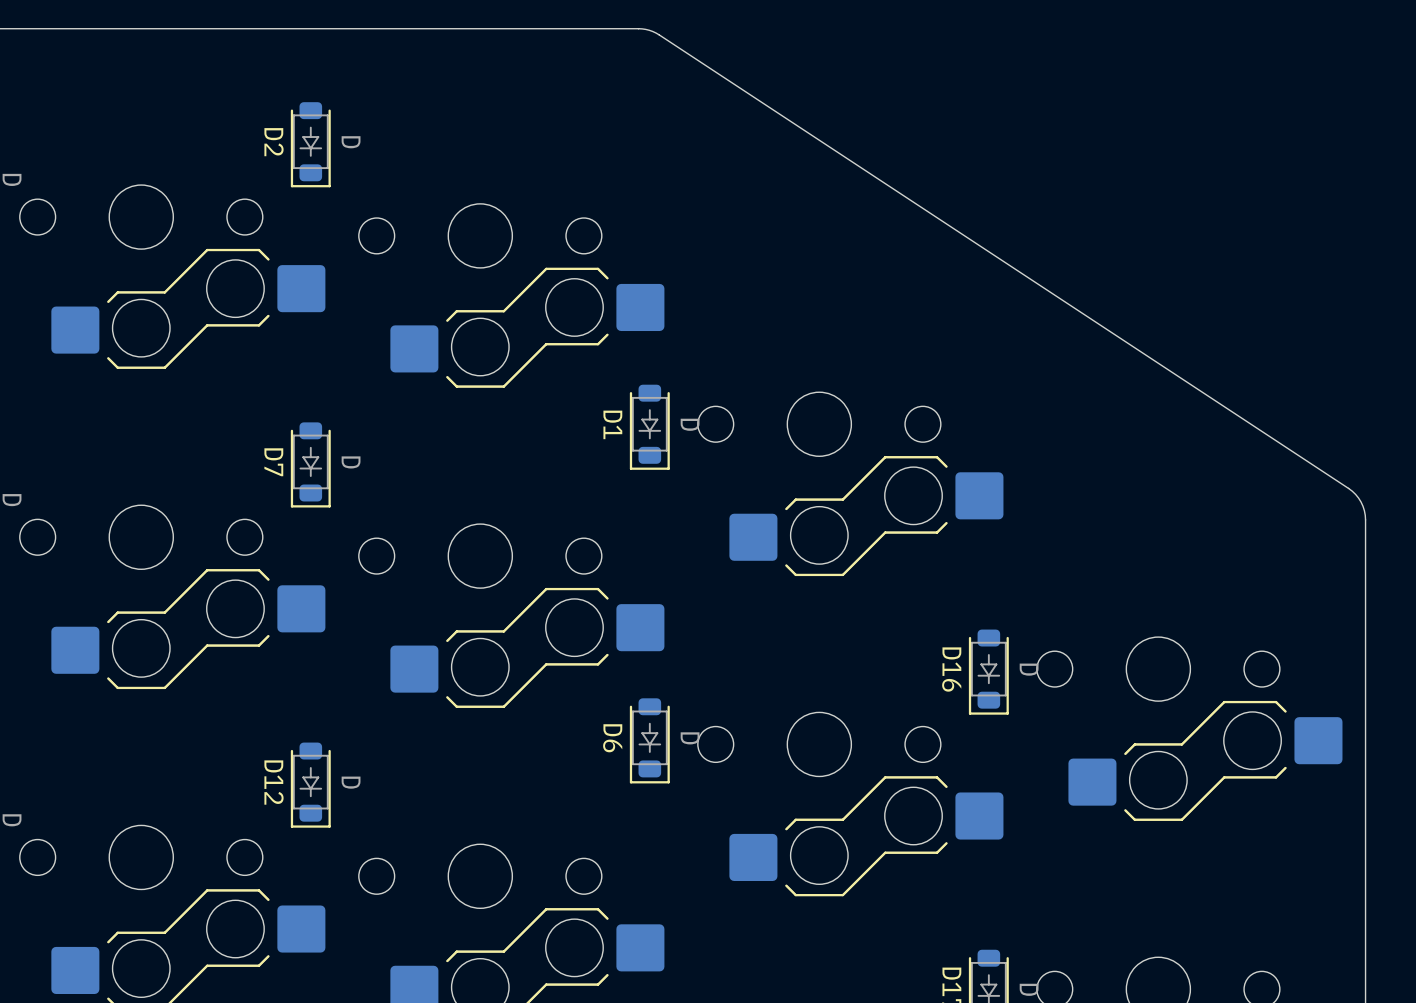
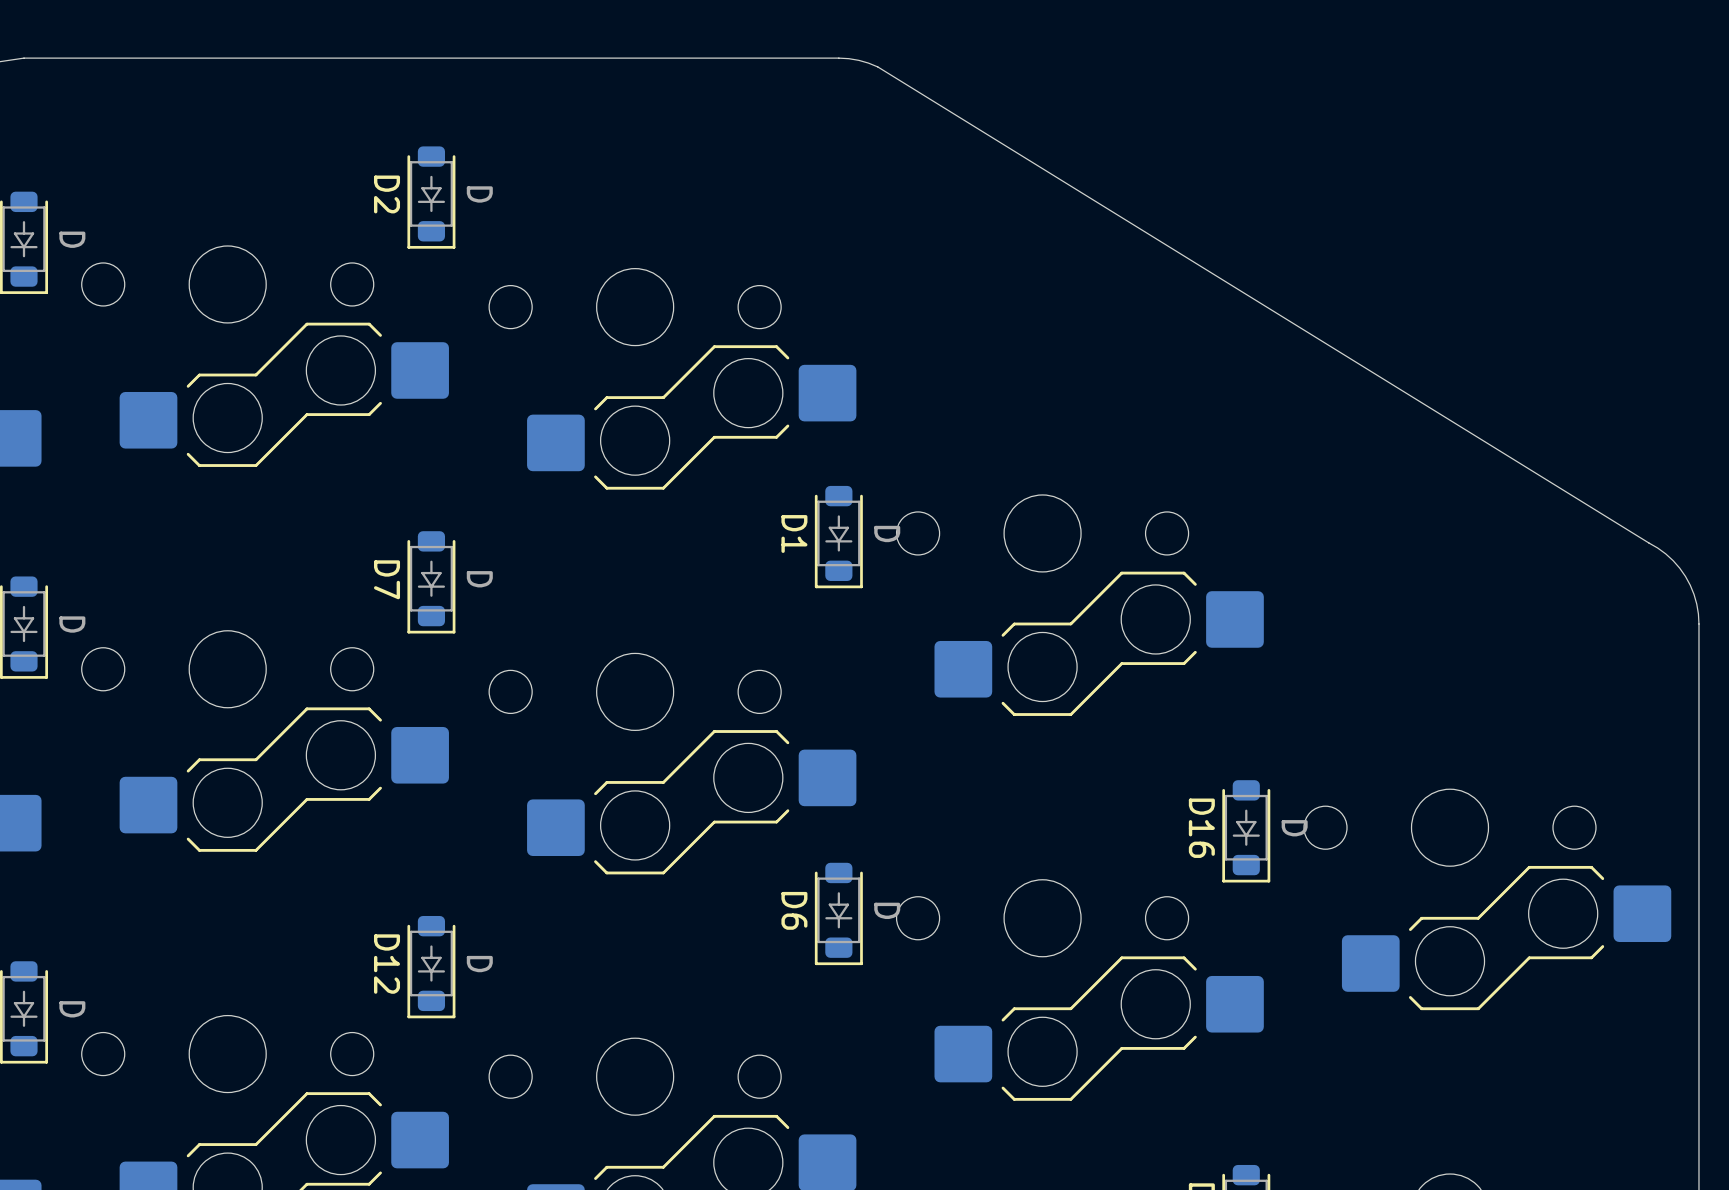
board edge: (638, 28) (649, 30) (659, 34) (1348, 488) (1361, 502) (1365, 519) -> (825, 58) (848, 58) (877, 66) (1657, 547) (1673, 560) (1690, 585) (1698, 613) (1698, 648)

